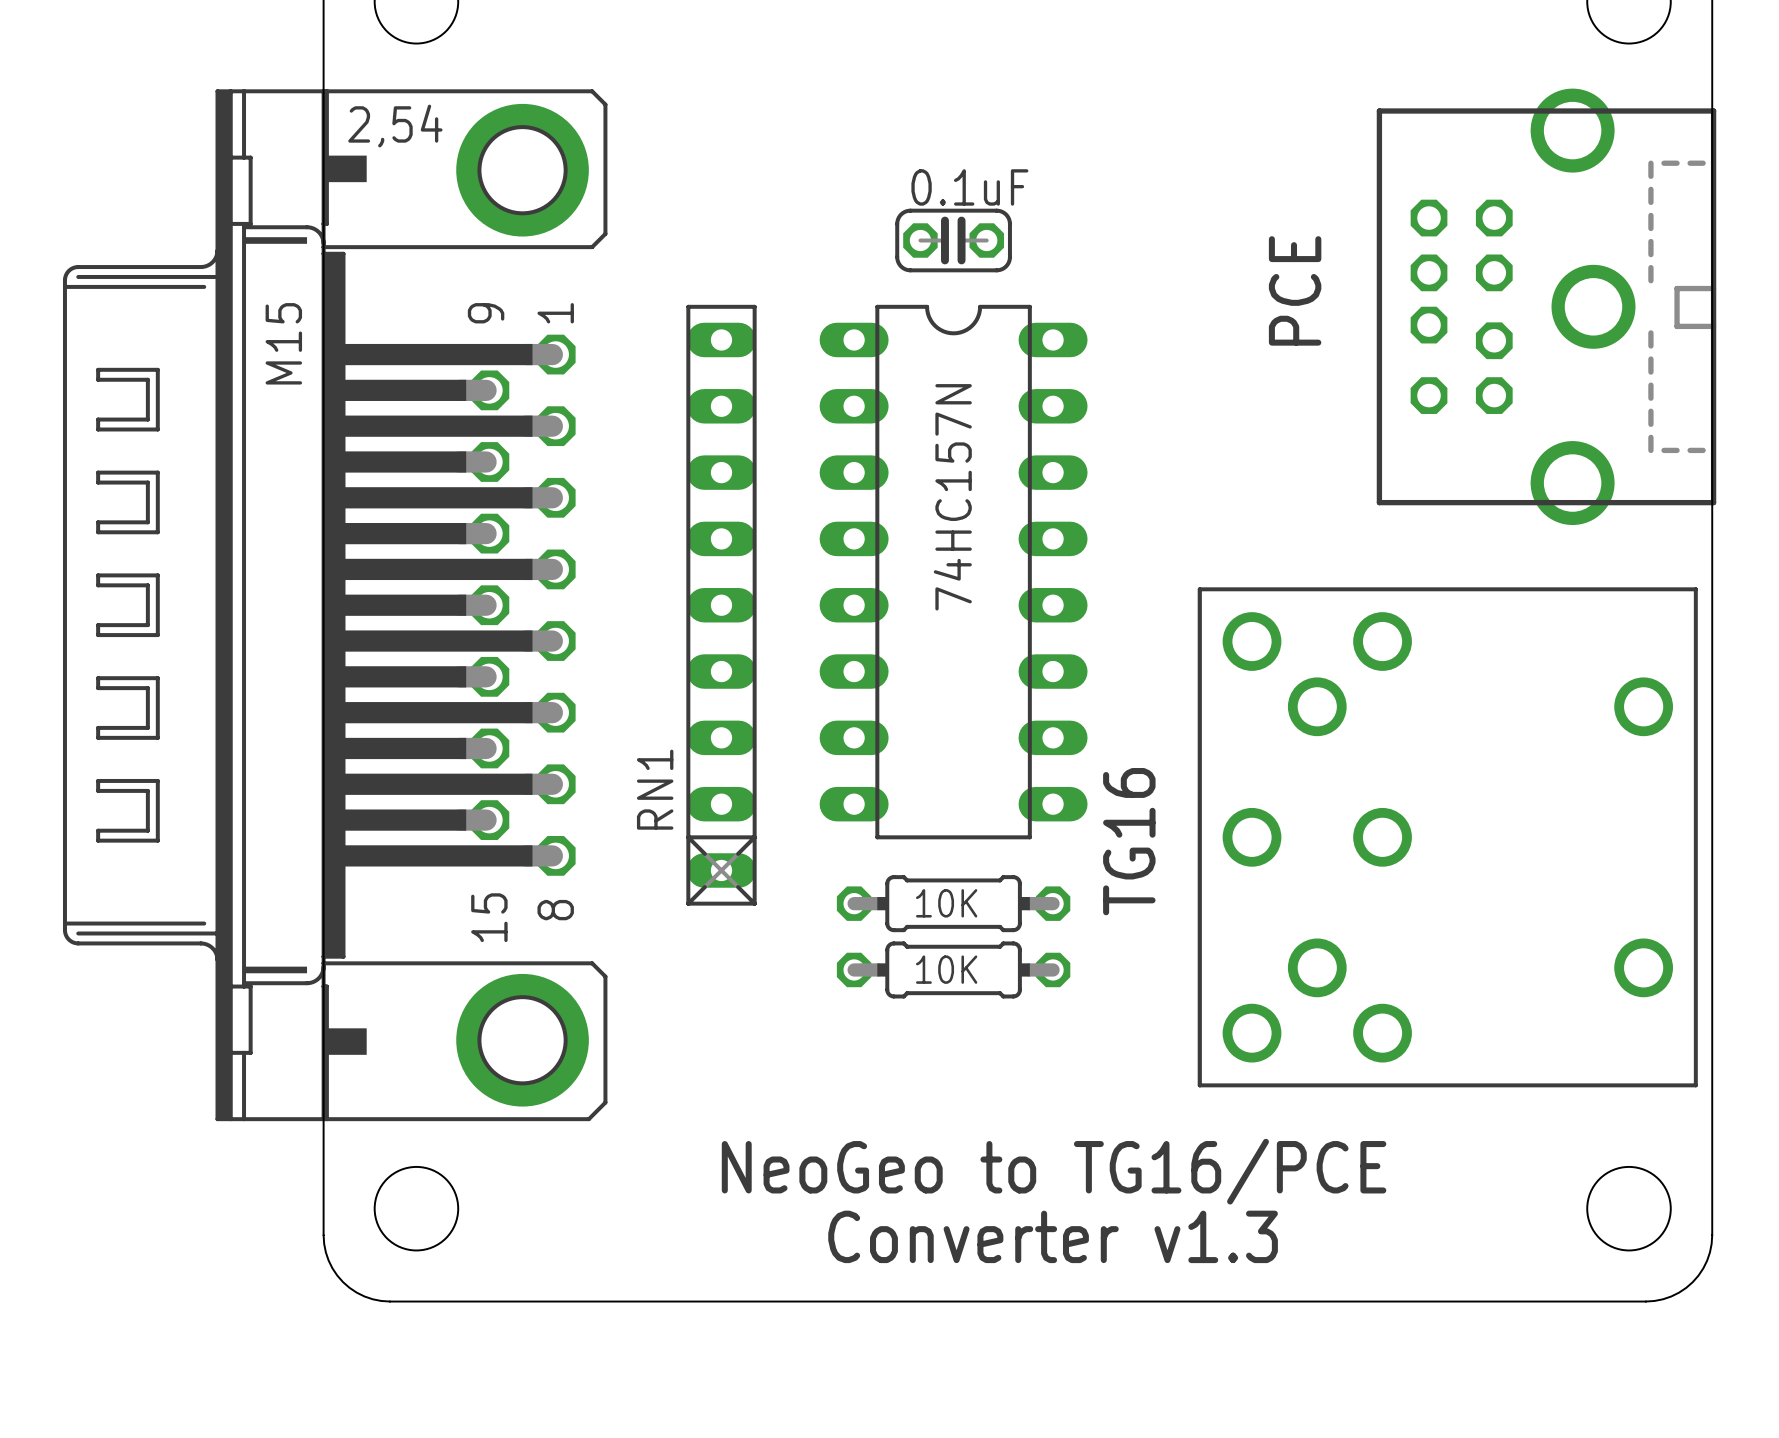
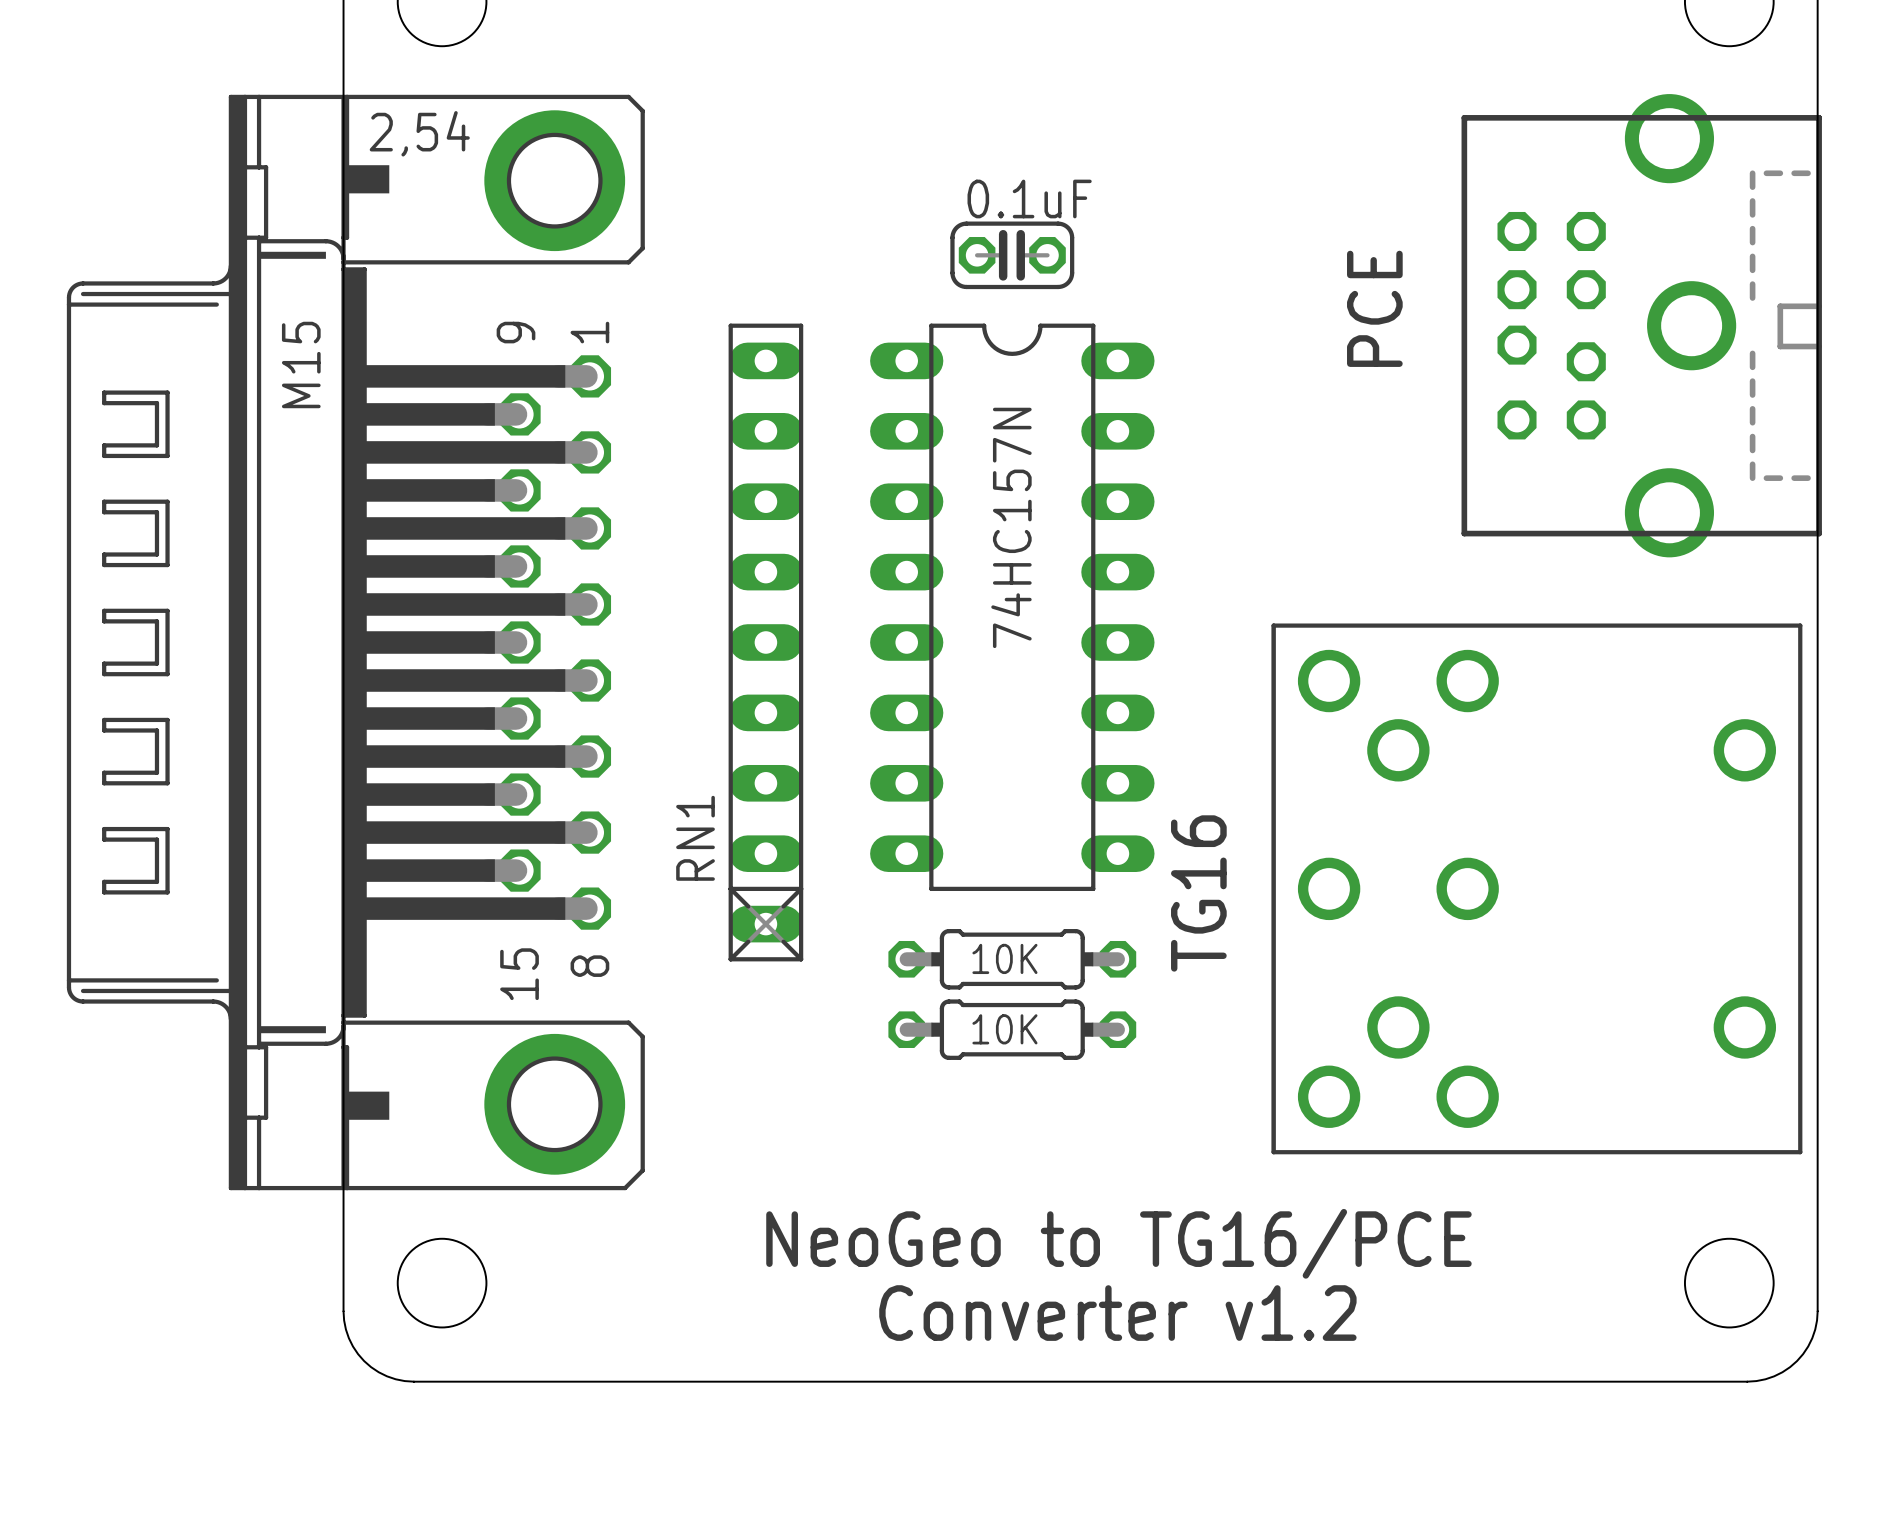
text: Converter v1.3 (1053, 1236) -> Converter v1.2 (1117, 1313)

